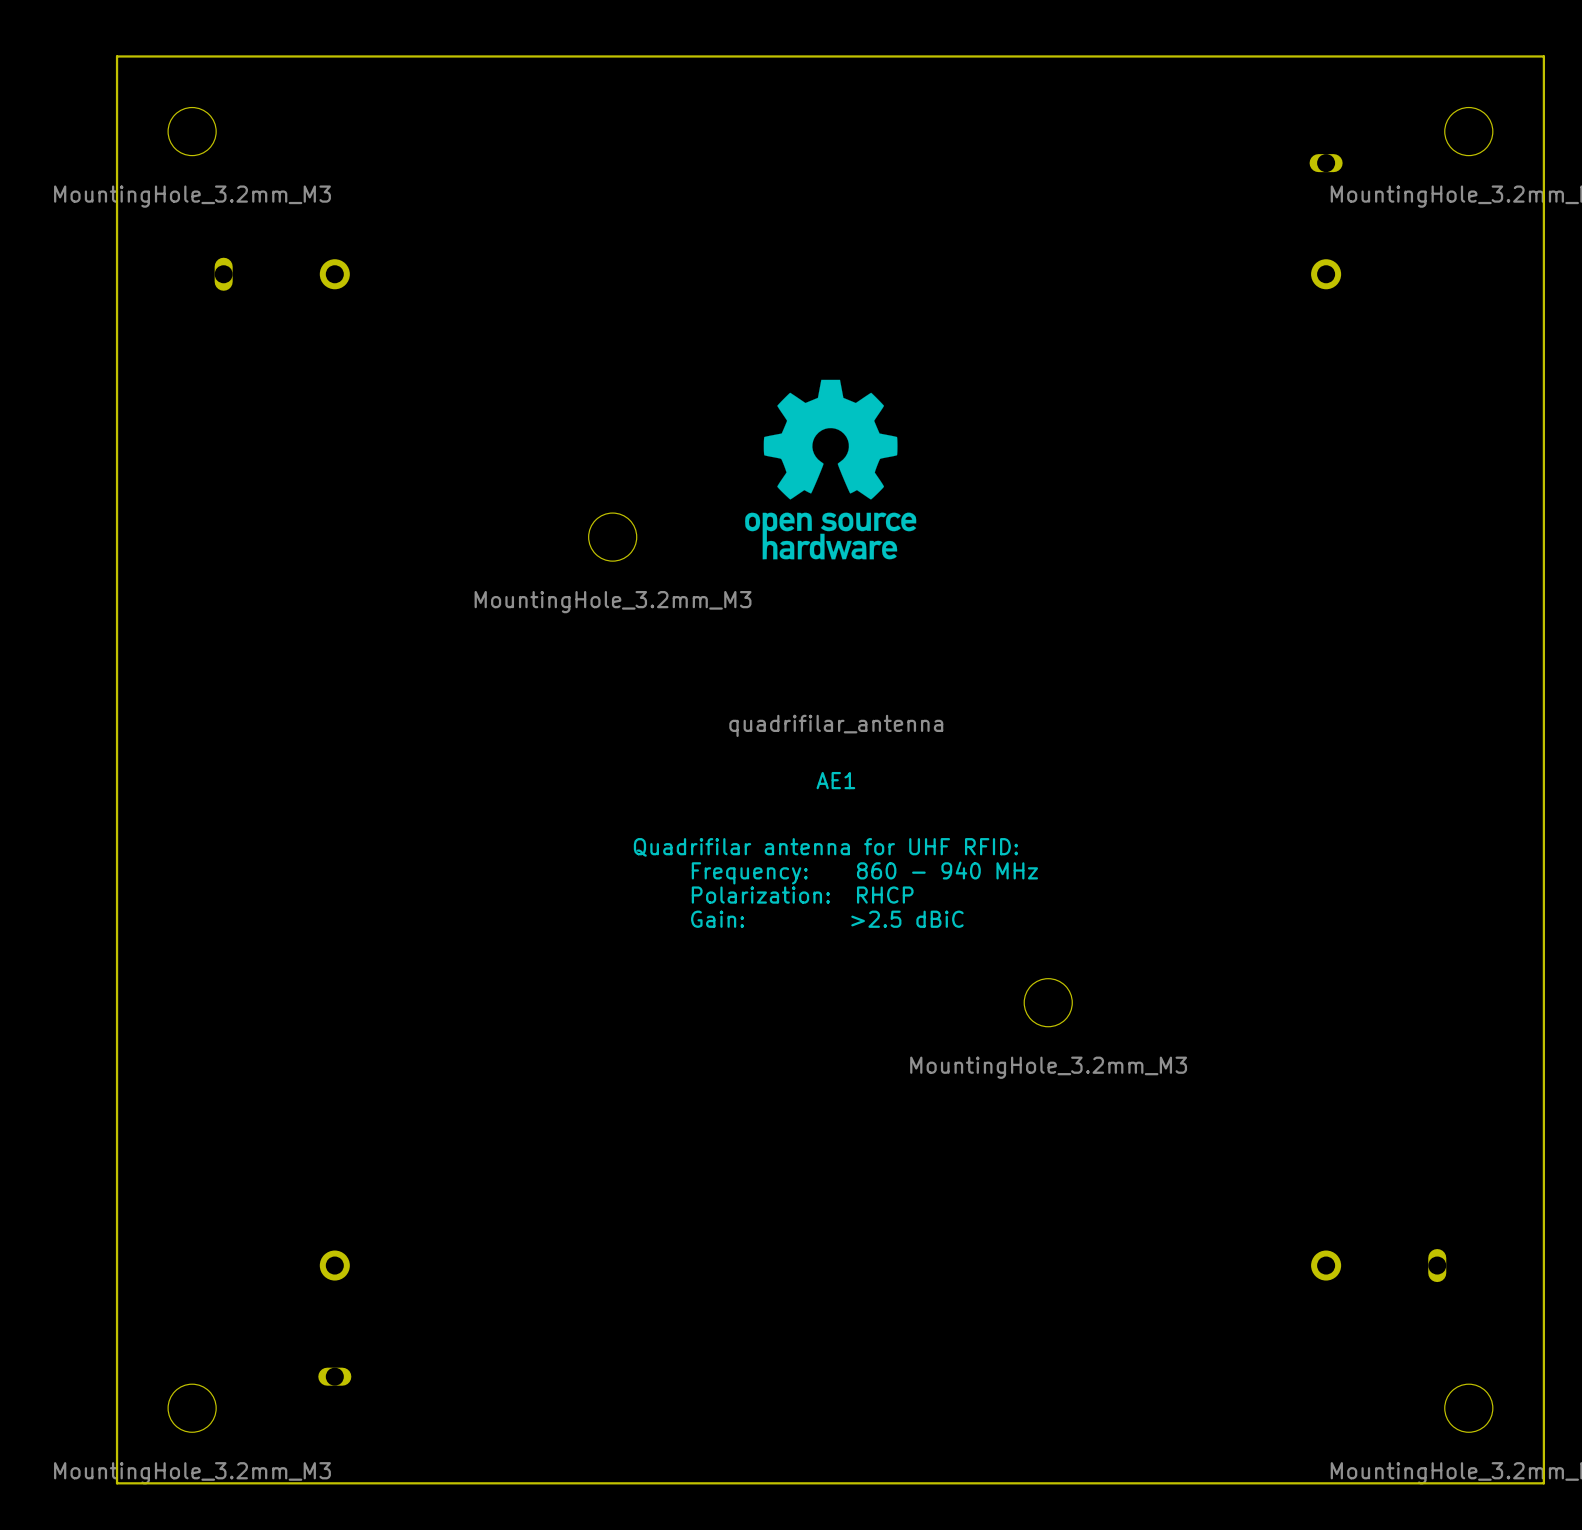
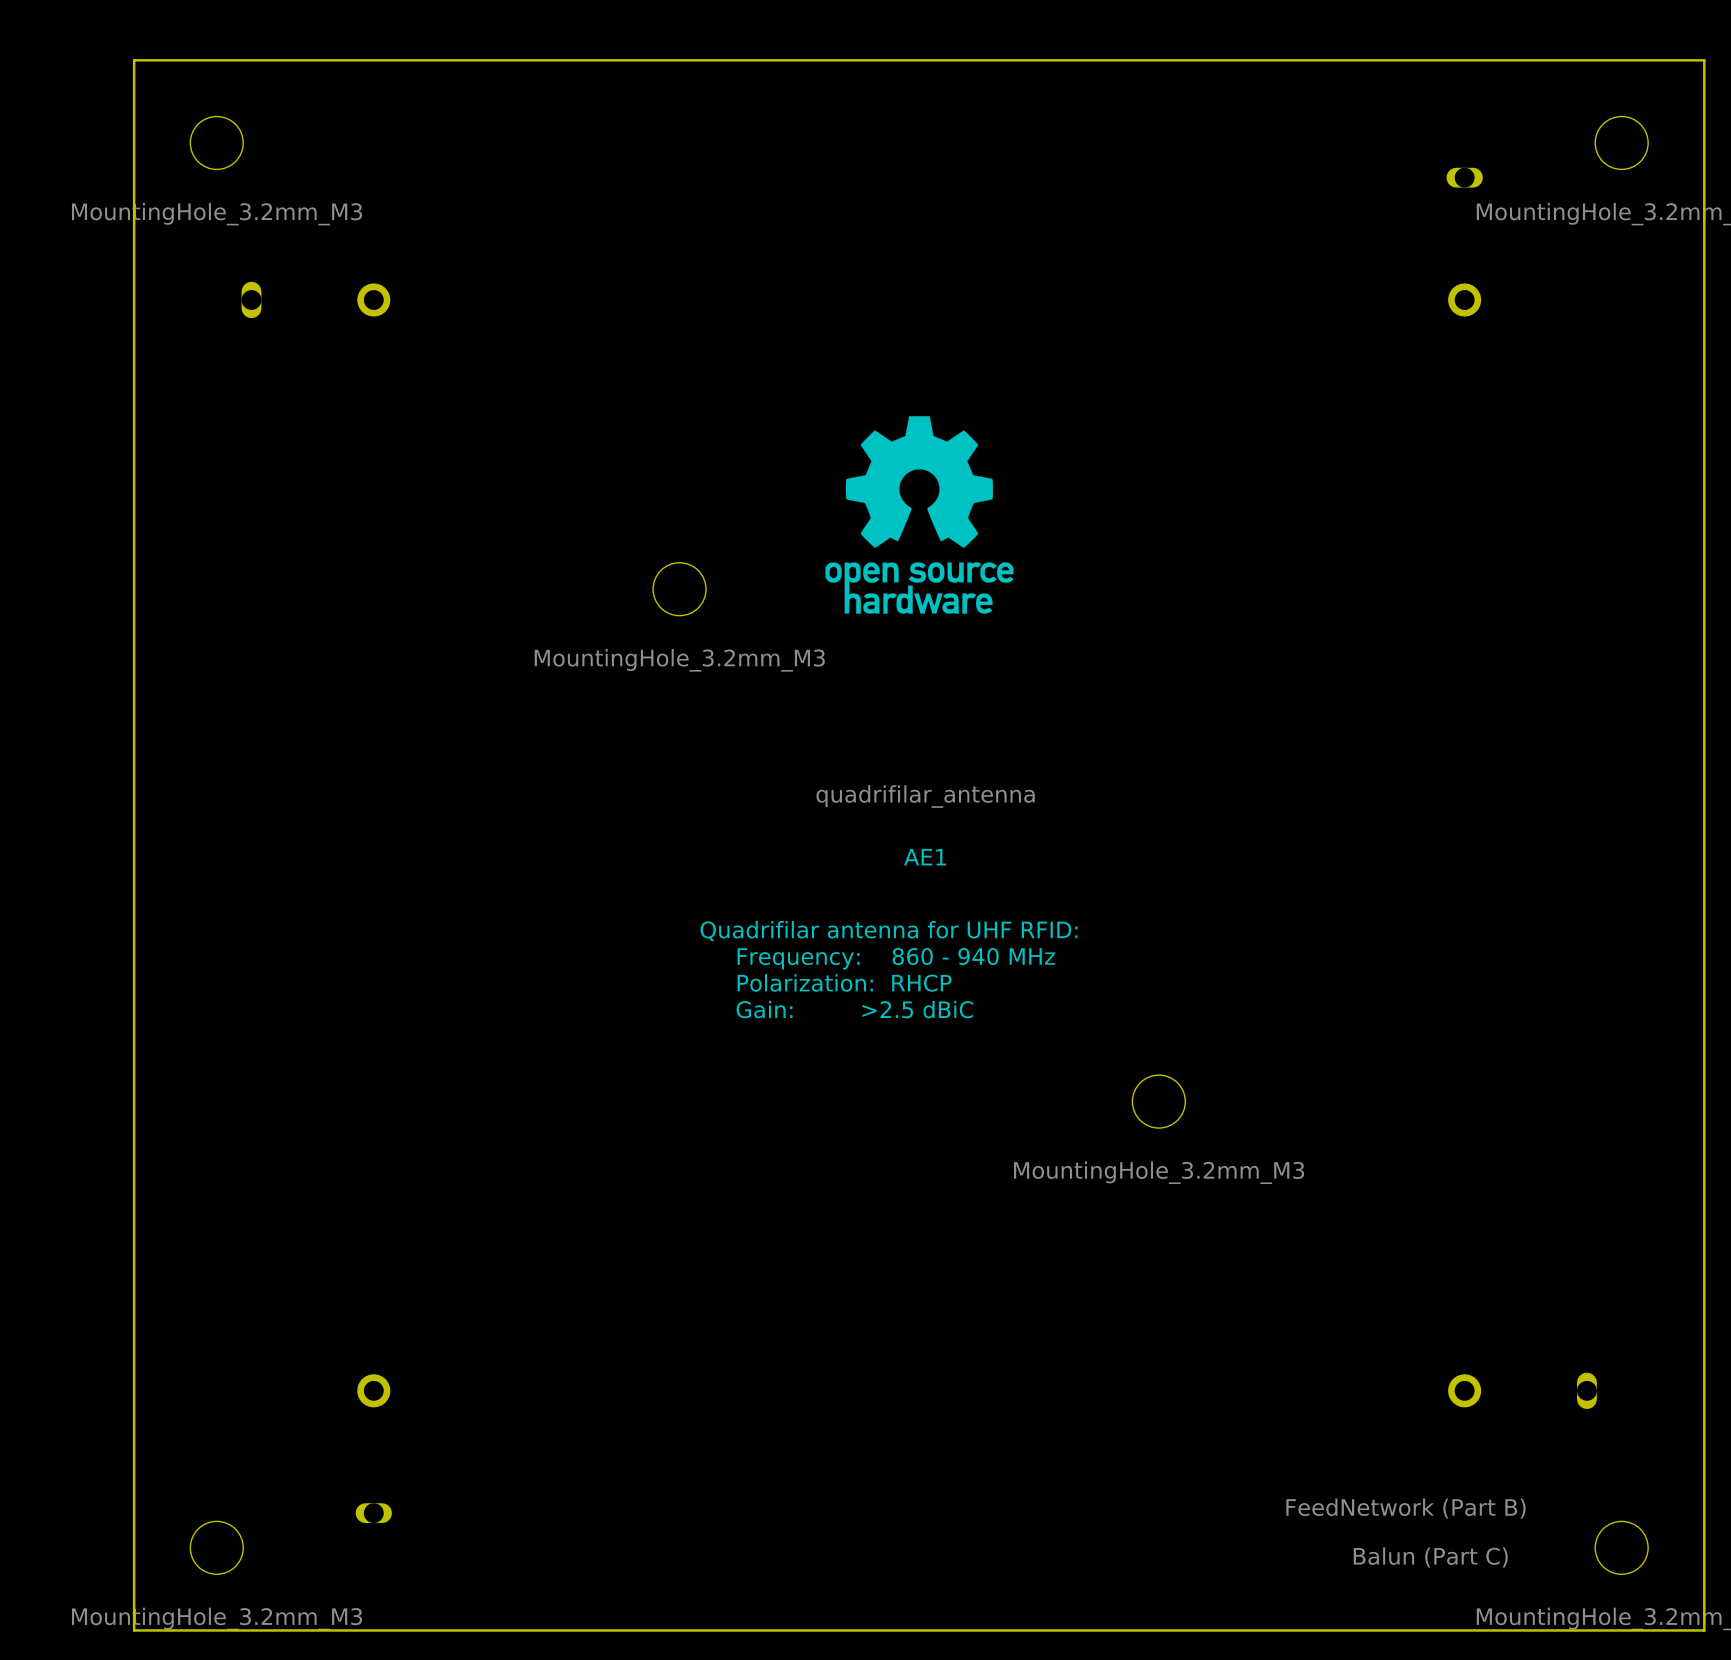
drawing: none -> [1286, 1498, 1526, 1568]

